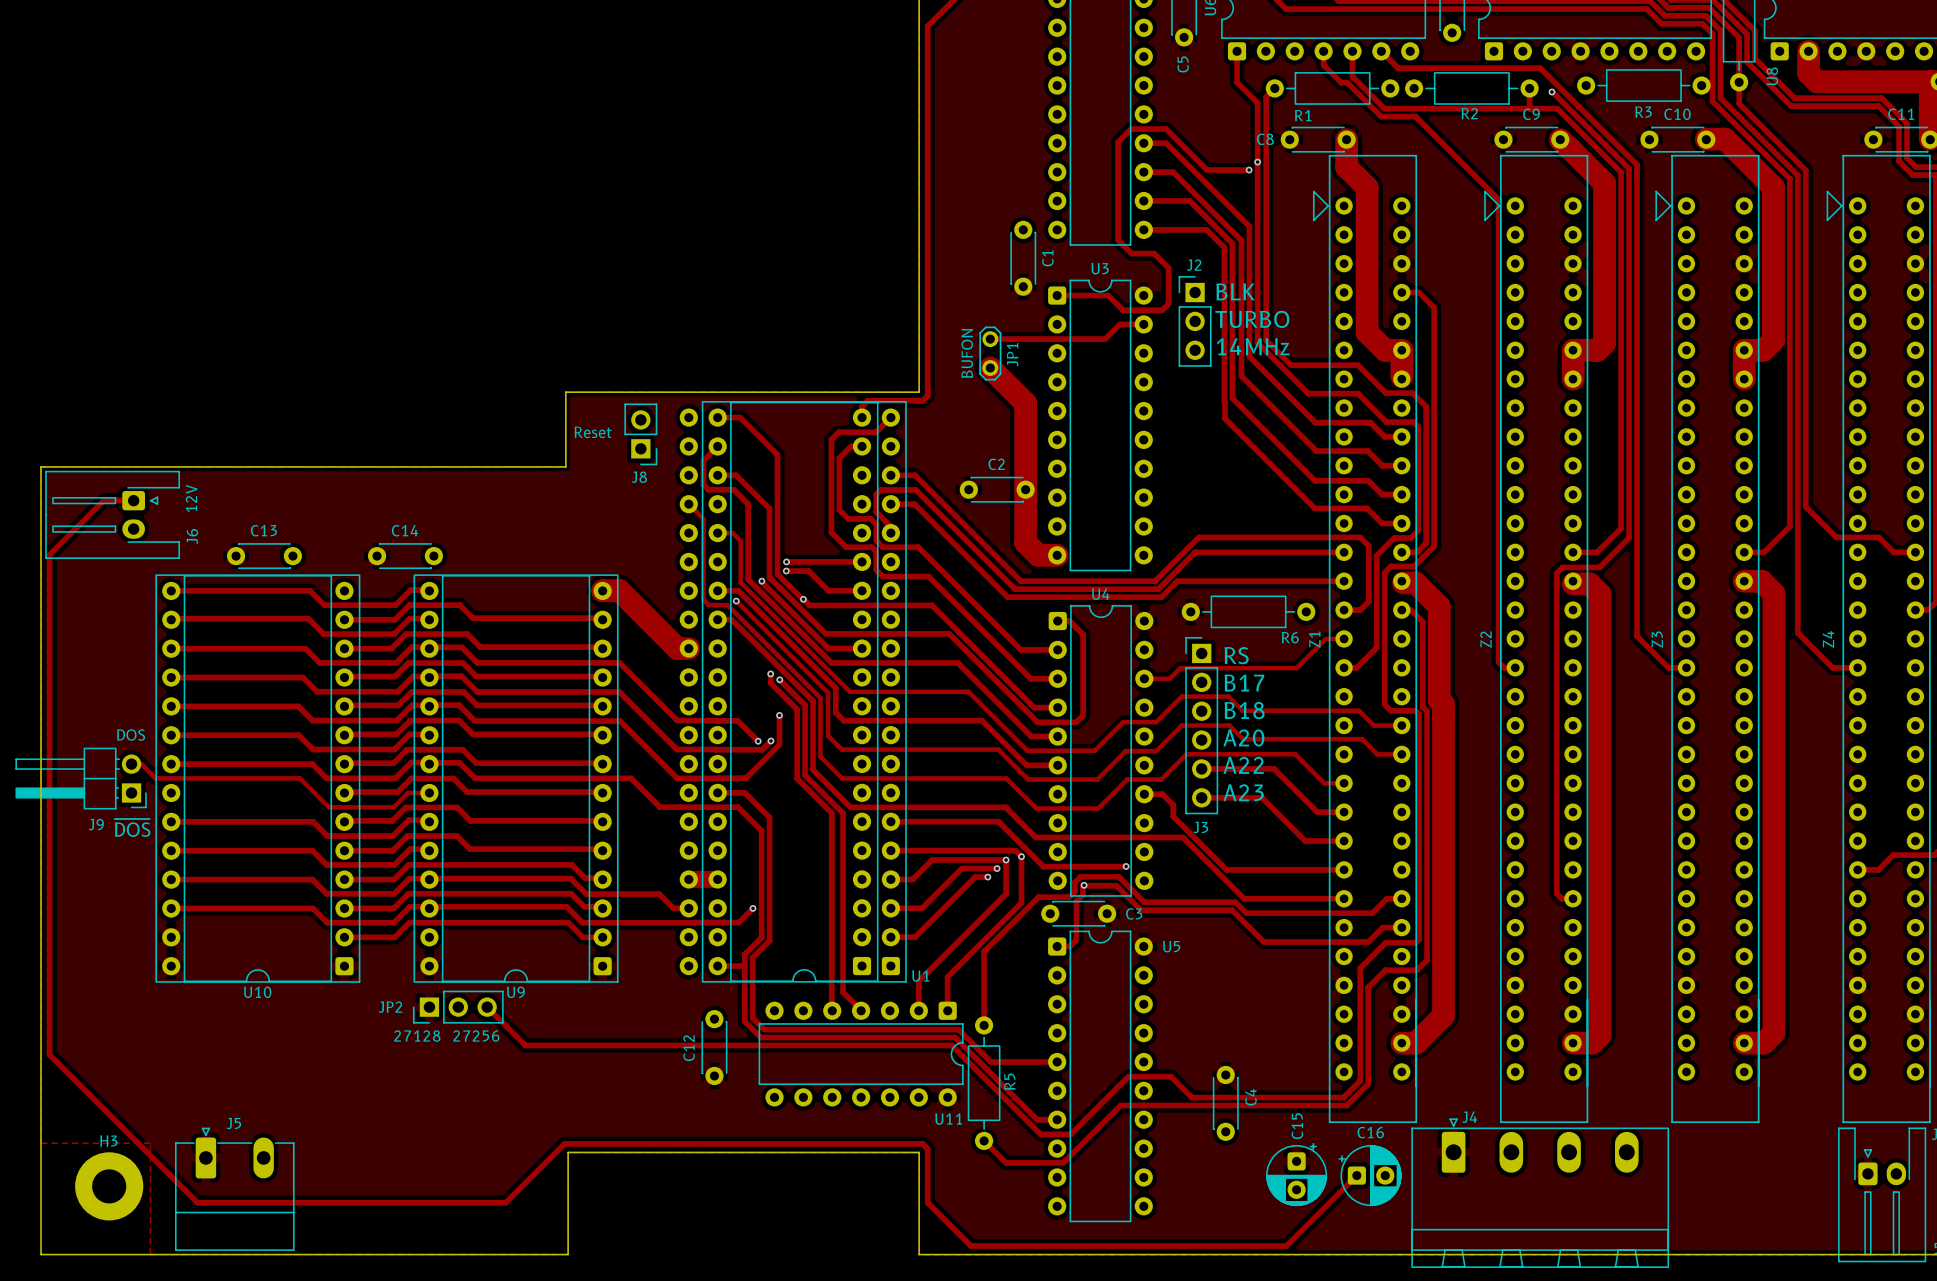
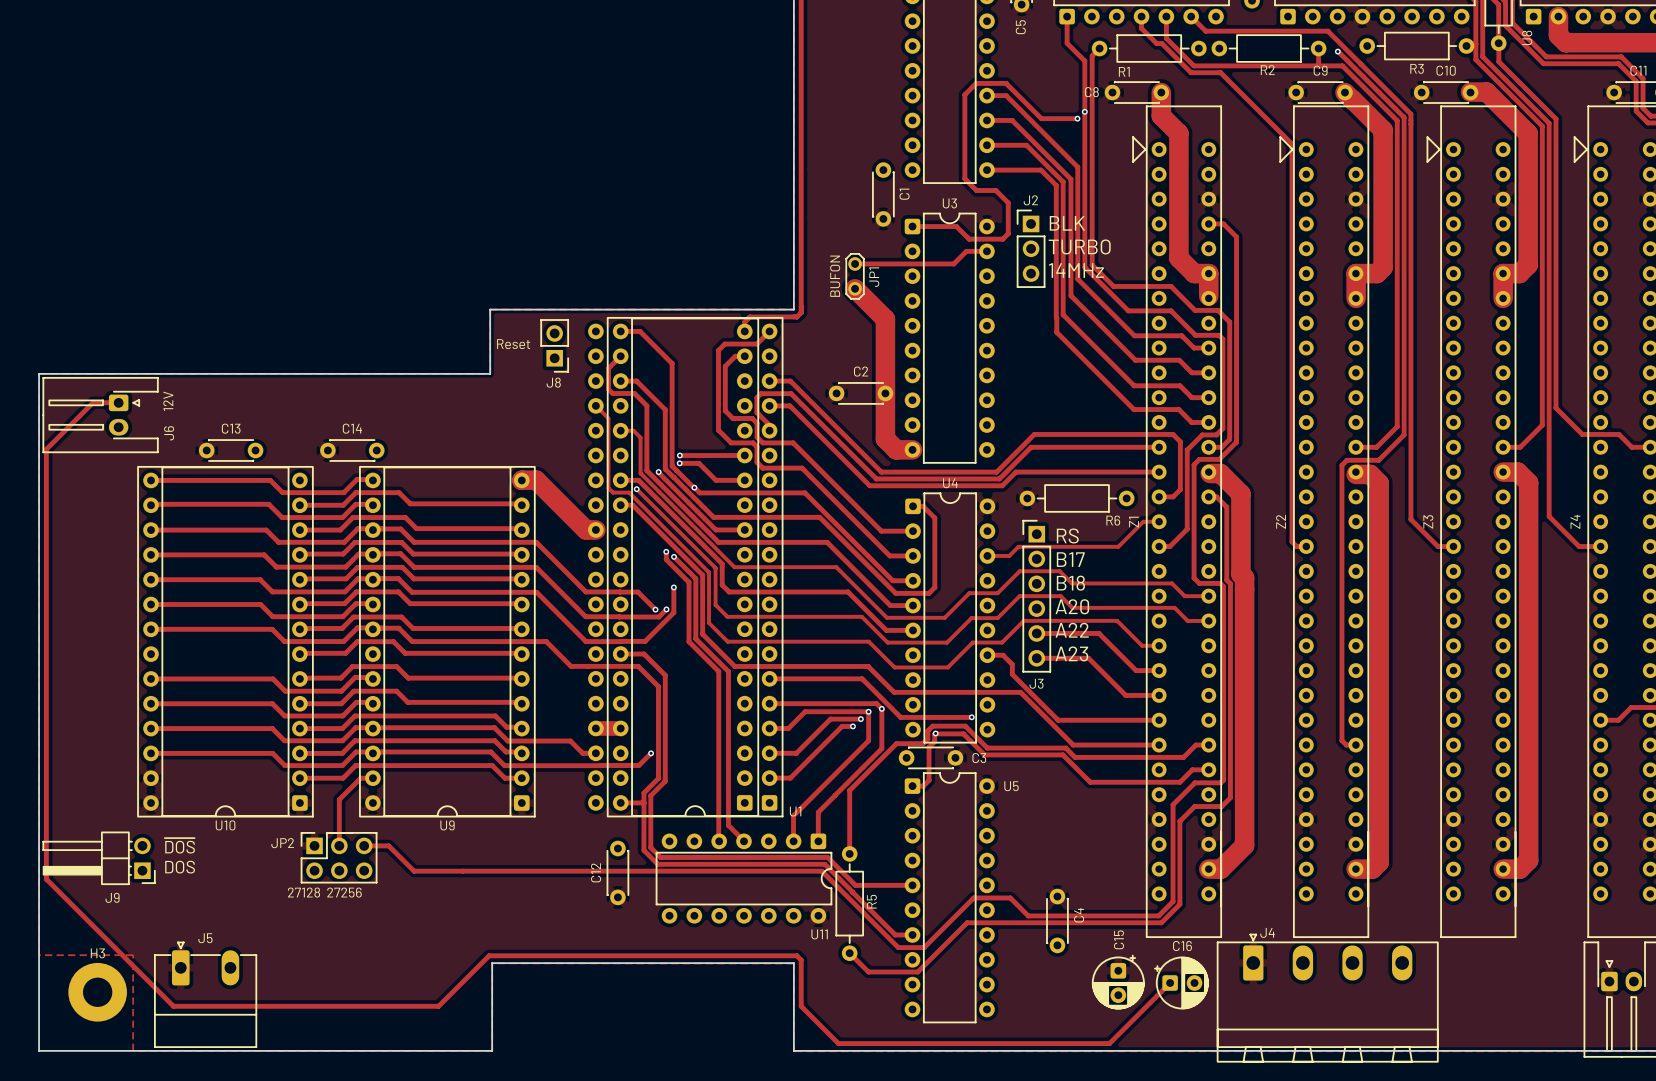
text: DOS (131, 735) -> none
track: (131, 764) (141, 764) (155, 778) (299, 778) (328, 807) (393, 807) (408, 792) (429, 792) -> none
J9 position: (81, 778) -> (99, 858)
text position: ~{DOS} (132, 827) -> ~{DOS} (179, 845)
track: none -> (372, 778) (360, 778) (339, 799) (339, 845)
JP2 footprint: [413, 990, 504, 1024] -> [300, 832, 378, 884]
track: (487, 1007) (525, 1045) -> (364, 845) (388, 845) (414, 871) (455, 871)
text position: 27128 27256 (446, 1036) -> 27128 27256 (324, 892)
text: none -> DOS (180, 867)

